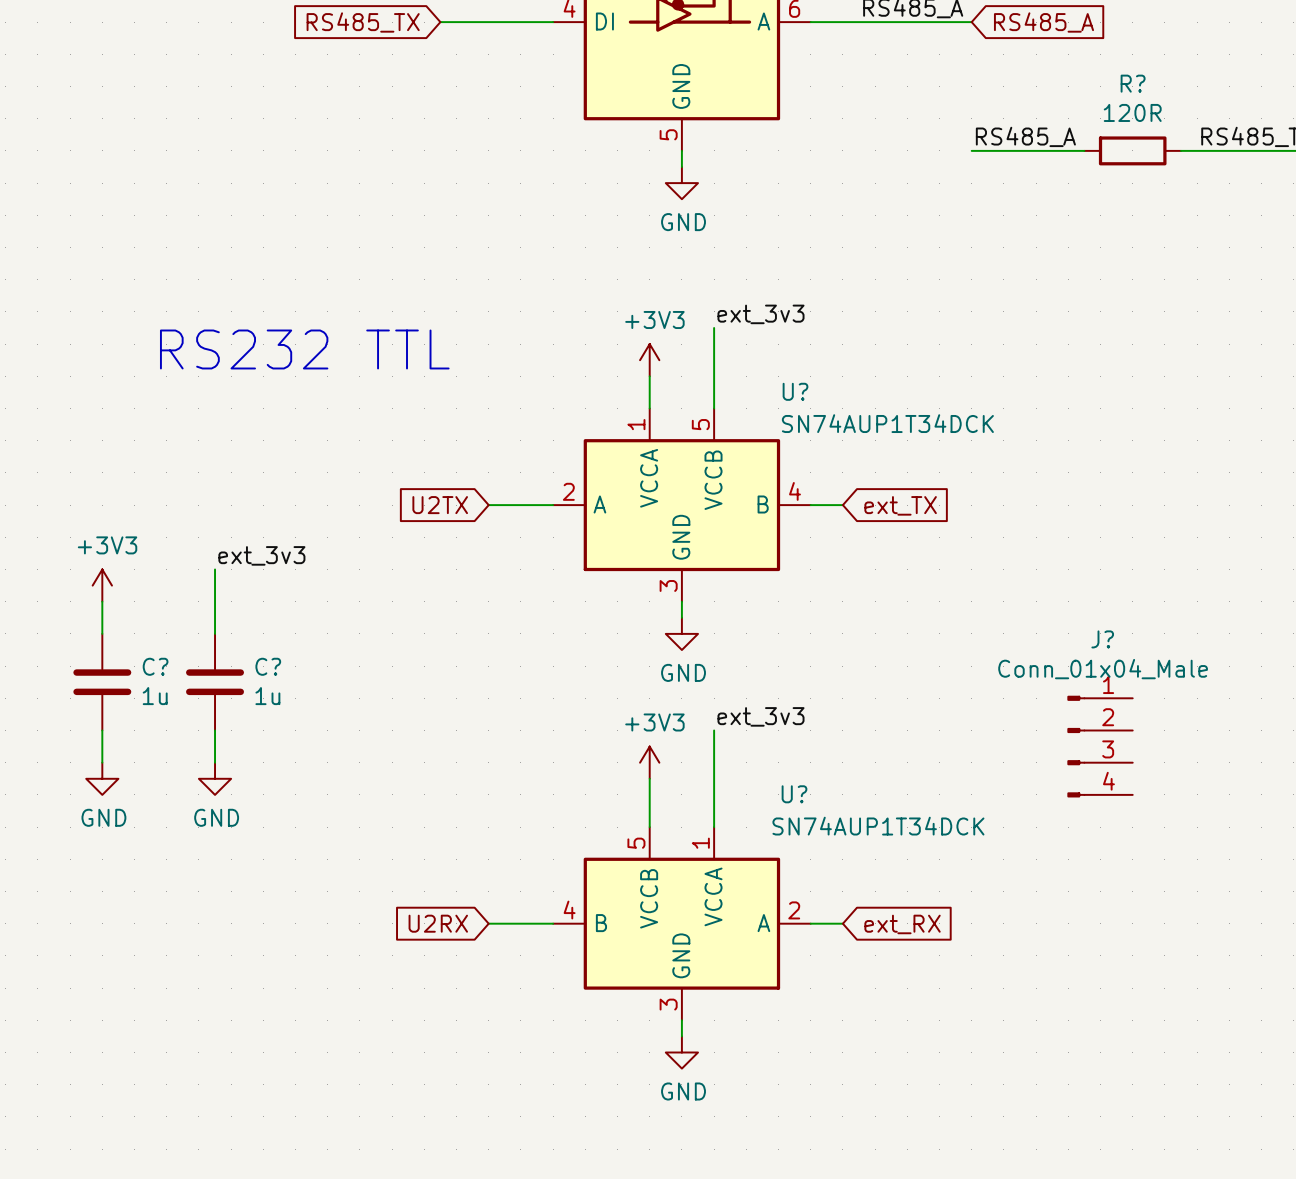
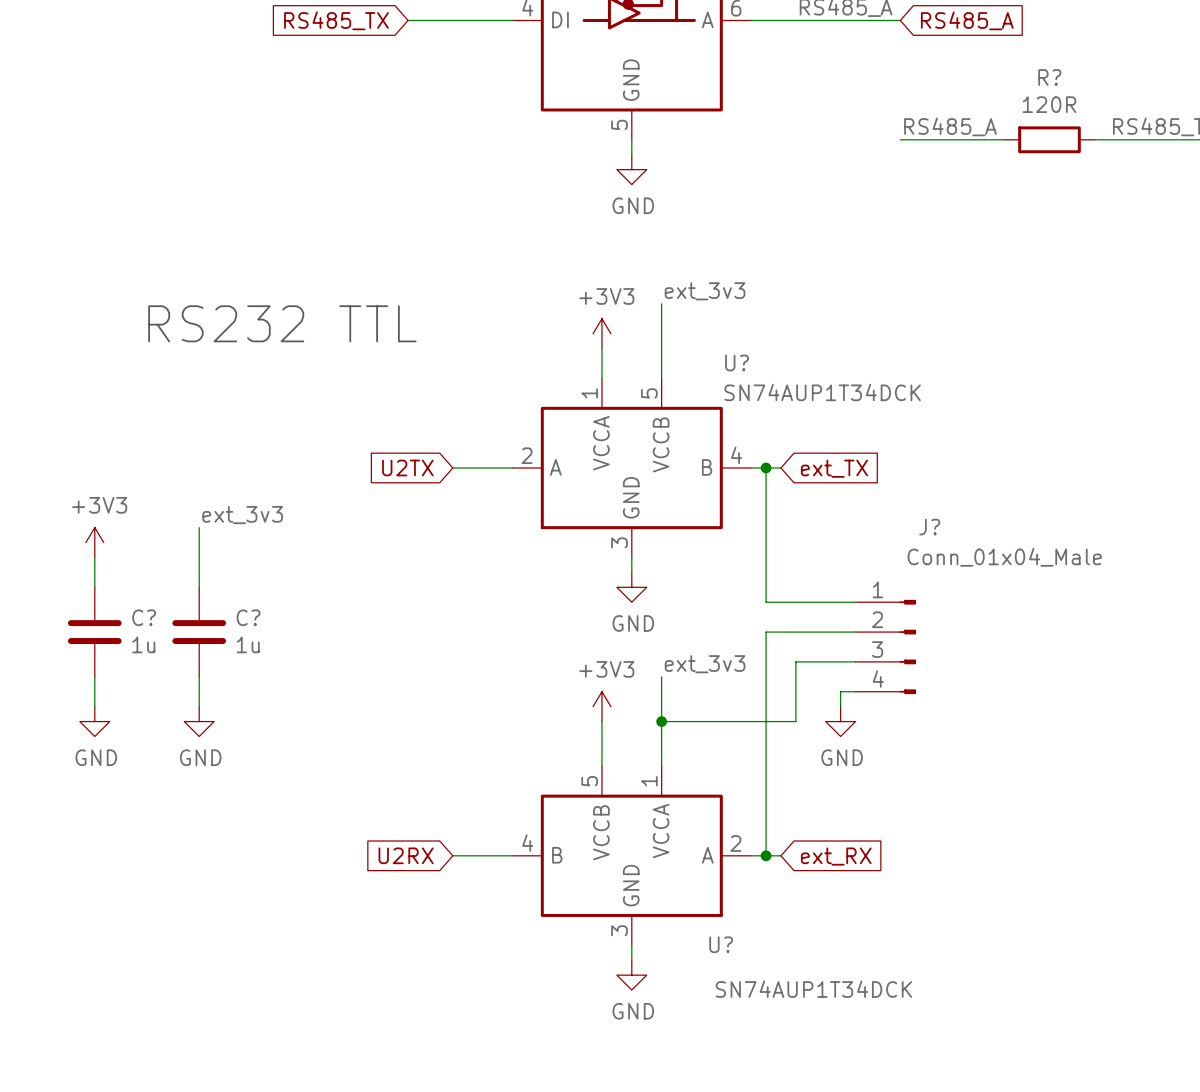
wire: none -> (766, 467) (766, 602) (855, 602)
junction: none -> (766, 467)
wire: none -> (855, 632) (766, 632) (766, 855)
J?: none -> Conn_01x04_Male (885, 646)
wire: none -> (855, 661) (795, 661) (795, 721) (661, 721)
wire: none -> (855, 691) (840, 691) (840, 706)
J?: Conn_01x04_Male (1100, 746) -> none
junction: none -> (661, 721)
power symbol: none -> GND (840, 721)
U? name position: U? (794, 794) -> U? (721, 944)
U? value position: SN74AUP1T34DCK (878, 826) -> SN74AUP1T34DCK (813, 989)
junction: none -> (766, 855)

